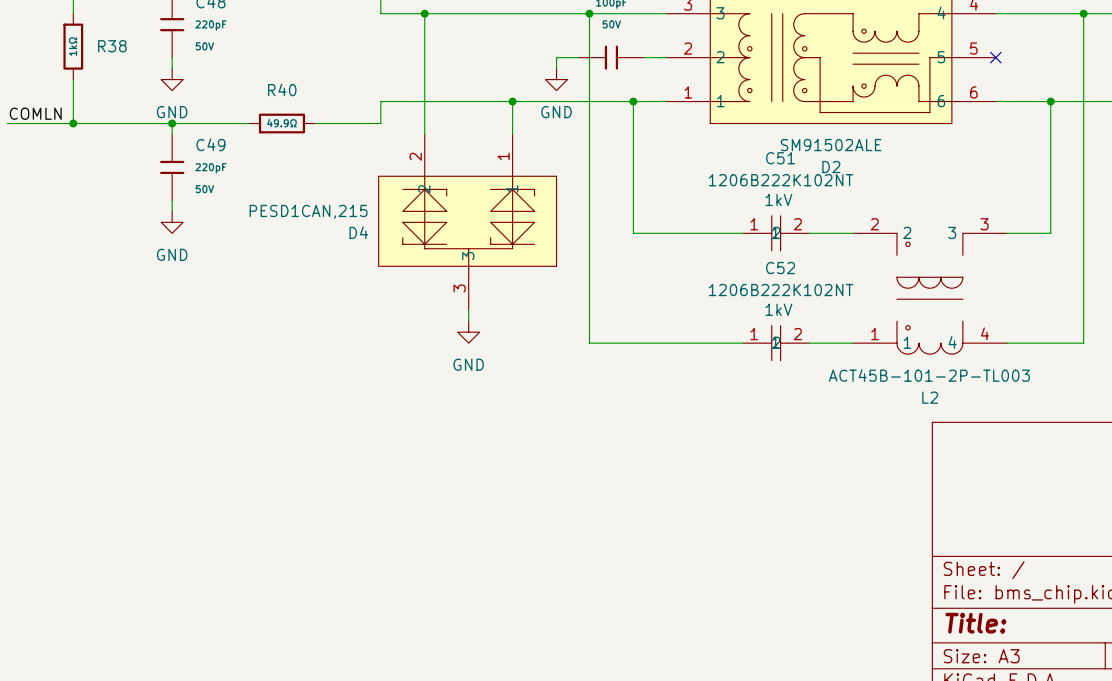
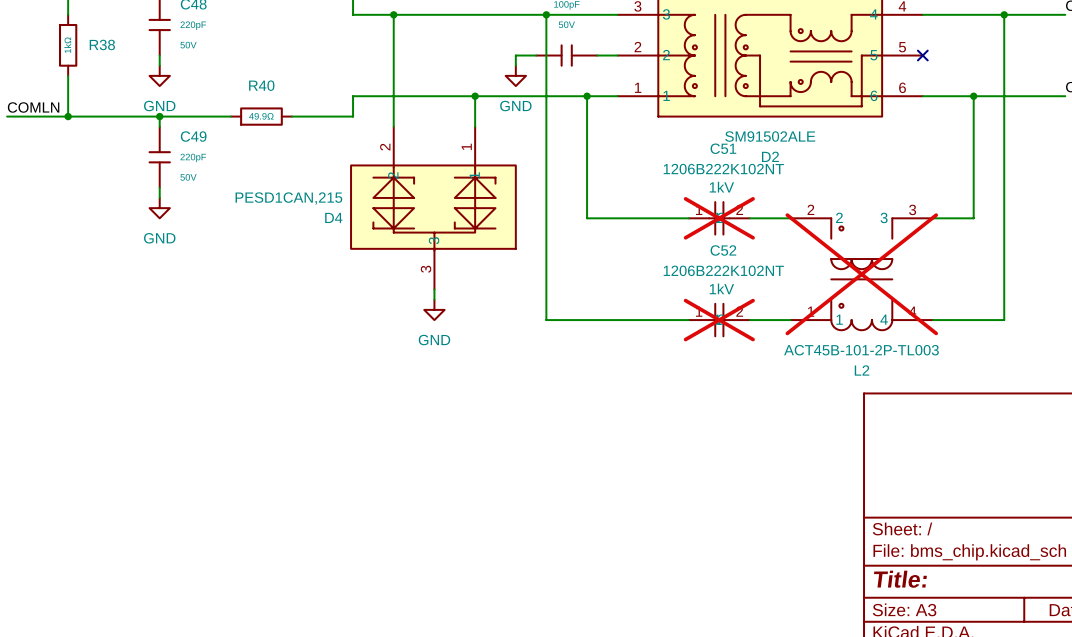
C51 do-not-place cross: none -> (719, 218)
L2 do-not-place cross: none -> (861, 274)
C52 do-not-place cross: none -> (719, 320)

